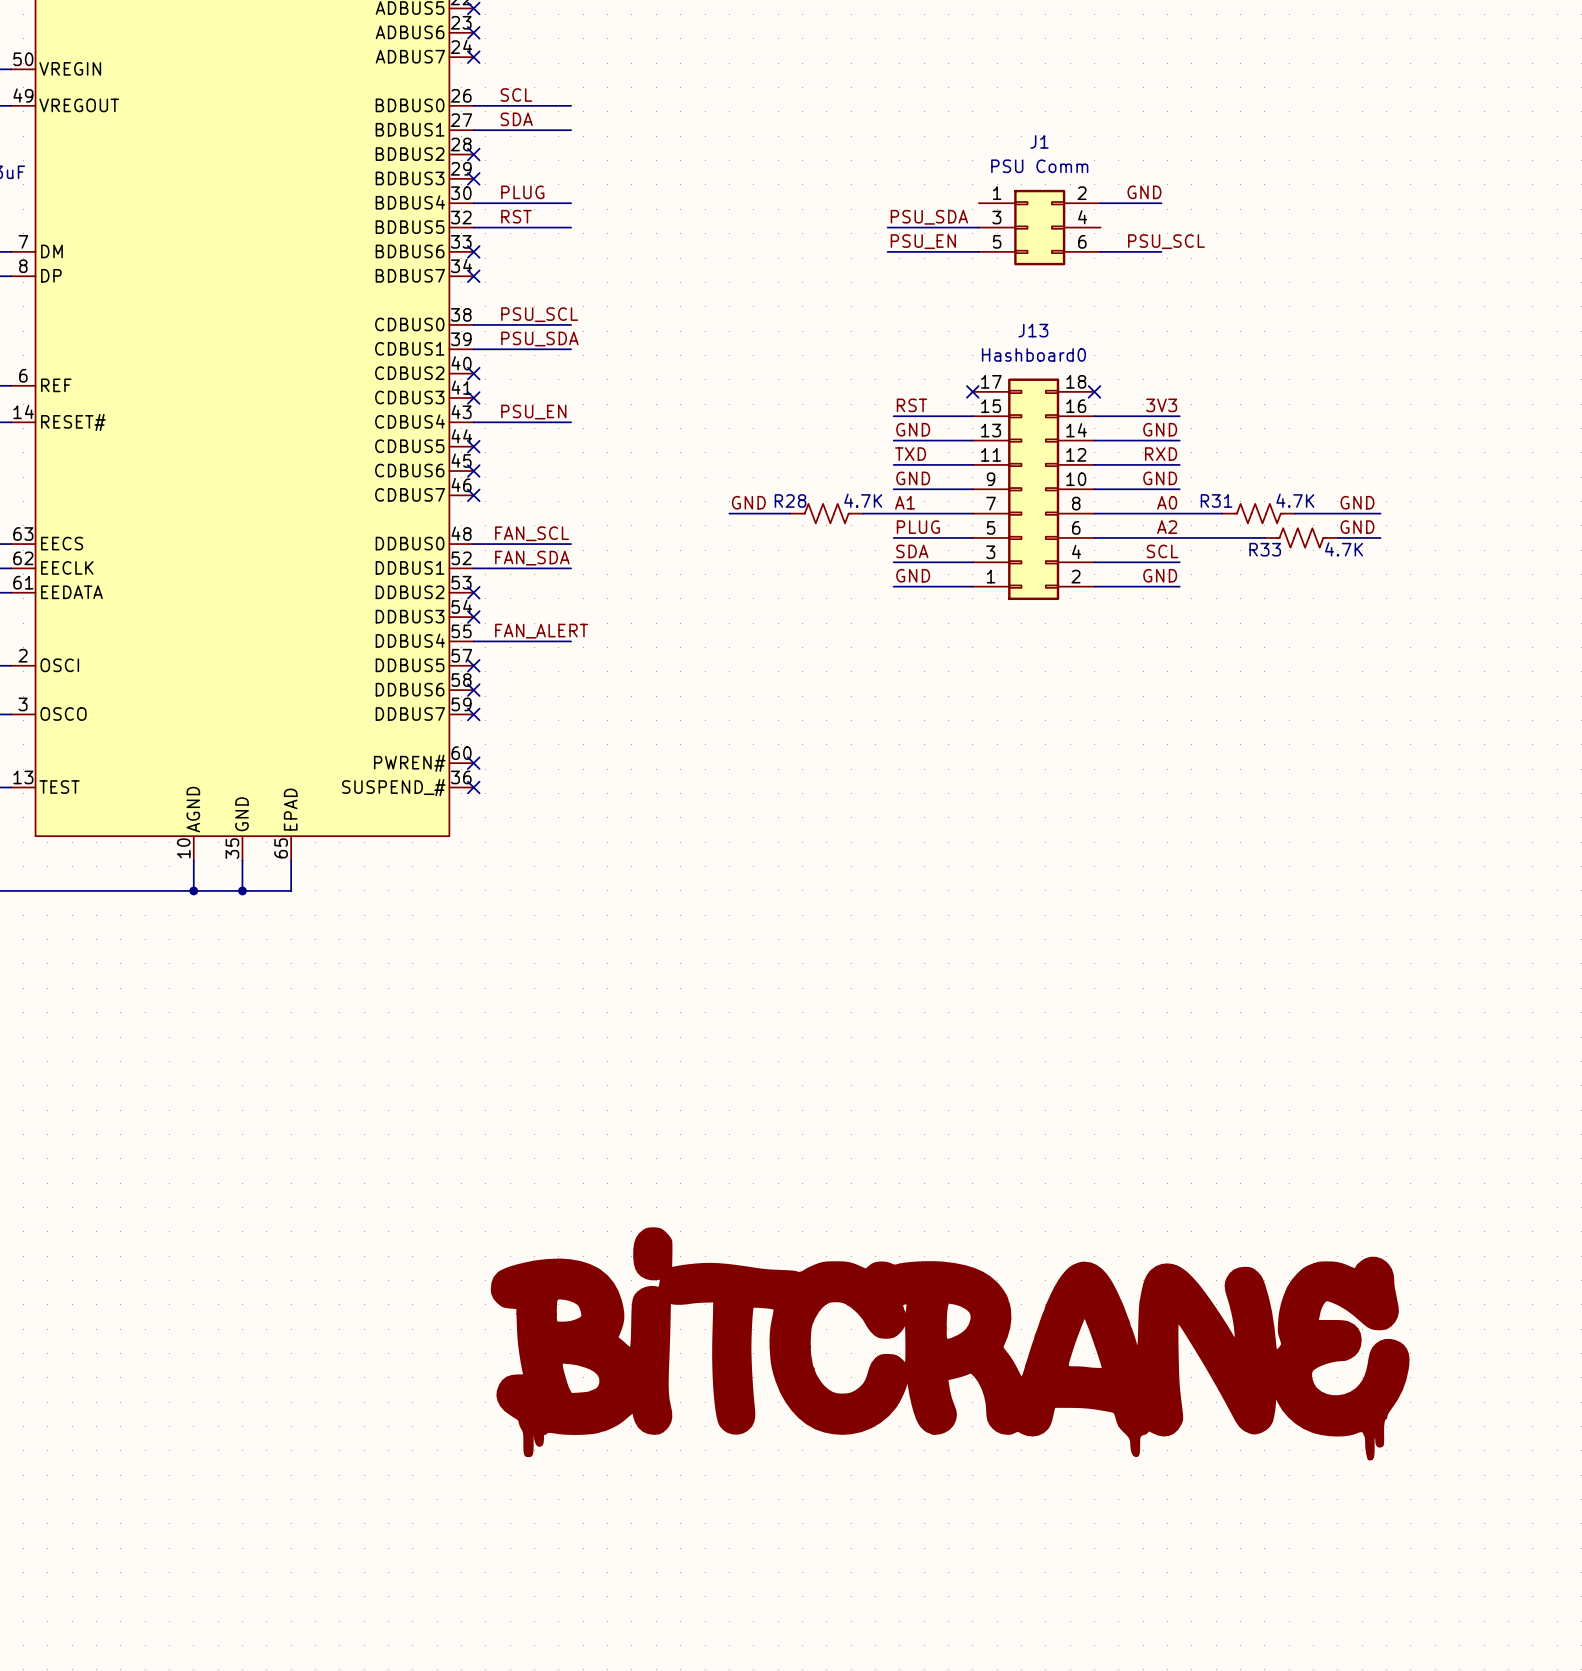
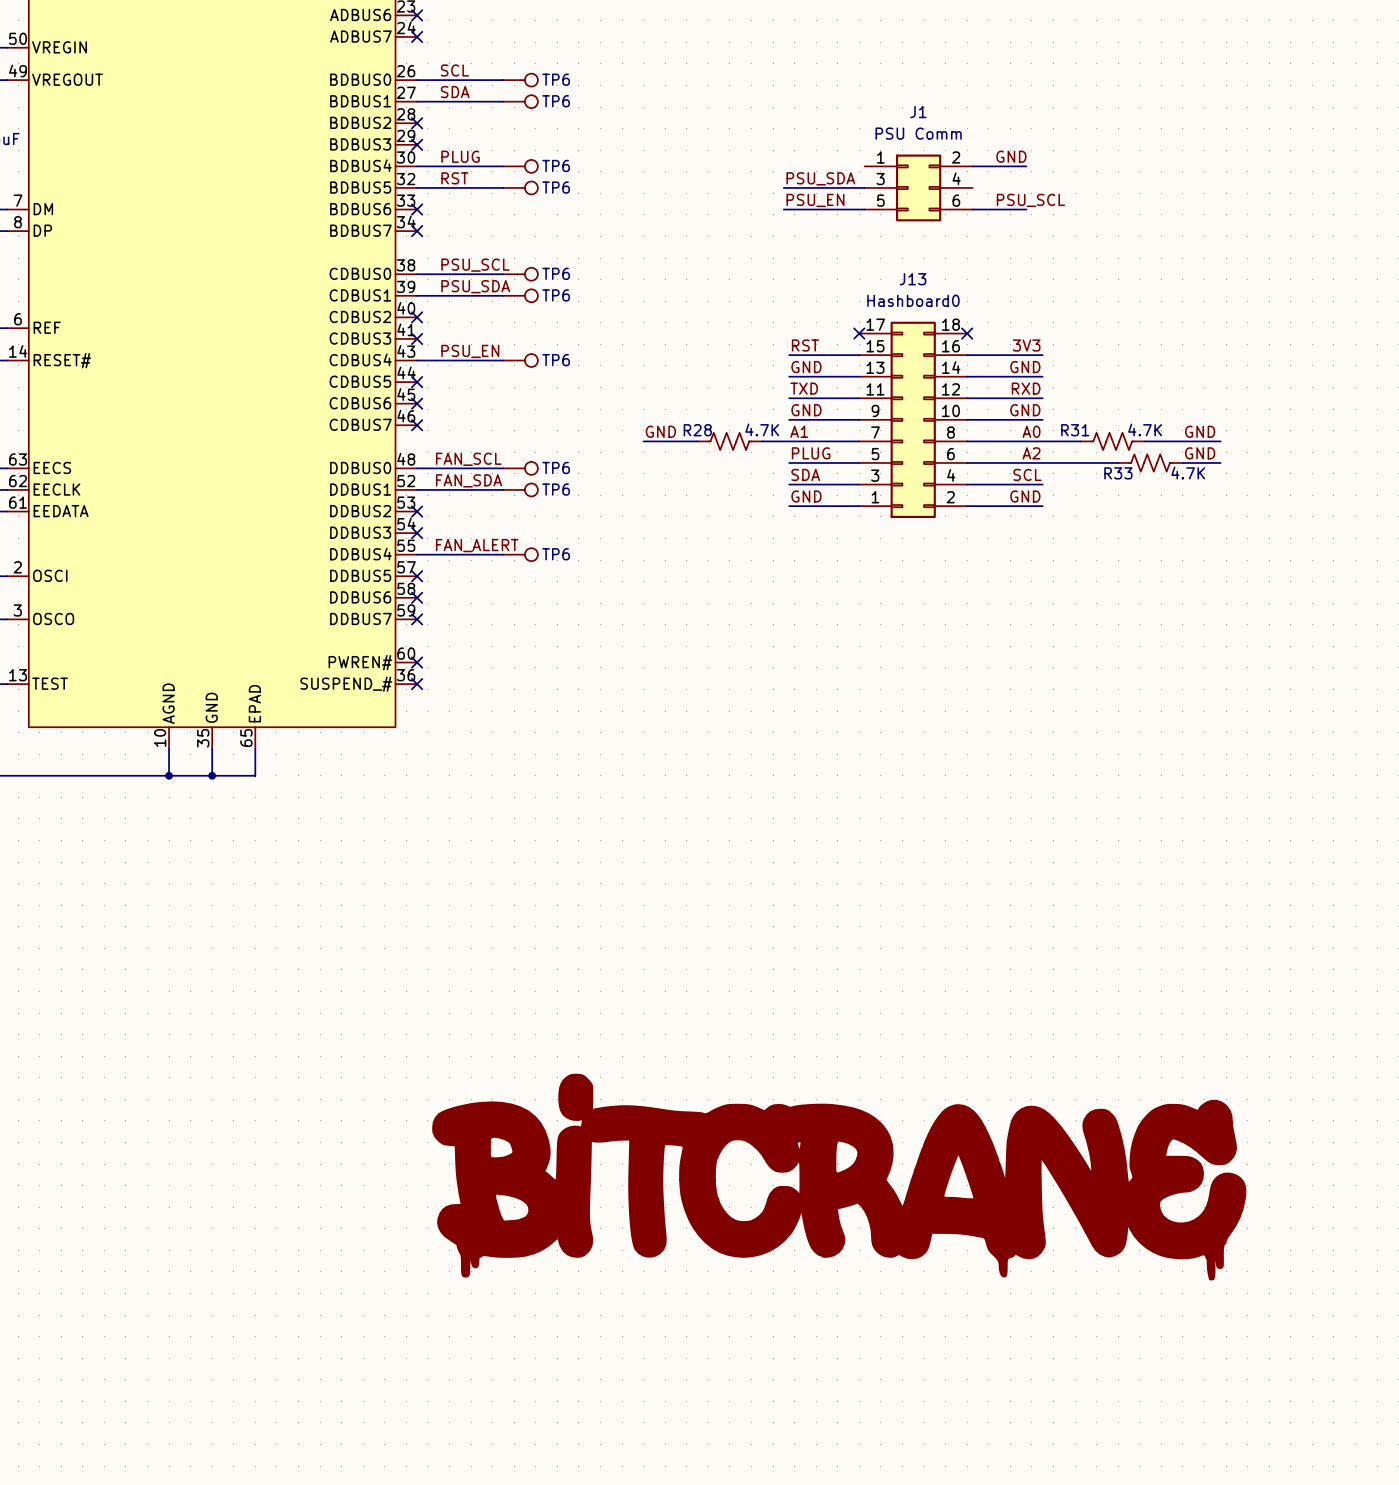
TP6: none -> (520, 80)
TP6: none -> (520, 101)
TP6: none -> (520, 166)
TP6: none -> (520, 187)
TP6: none -> (520, 274)
TP6: none -> (520, 295)
TP6: none -> (520, 360)
TP6: none -> (520, 468)
TP6: none -> (520, 489)
TP6: none -> (520, 554)

